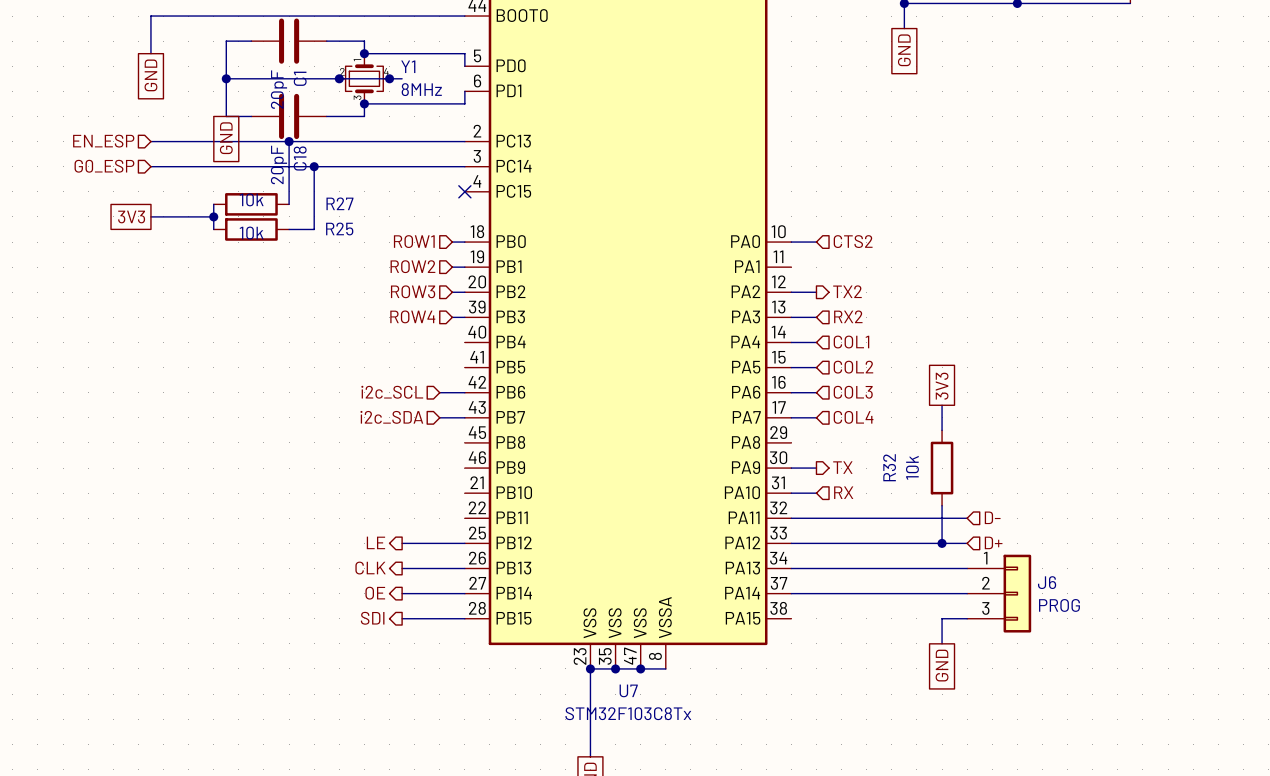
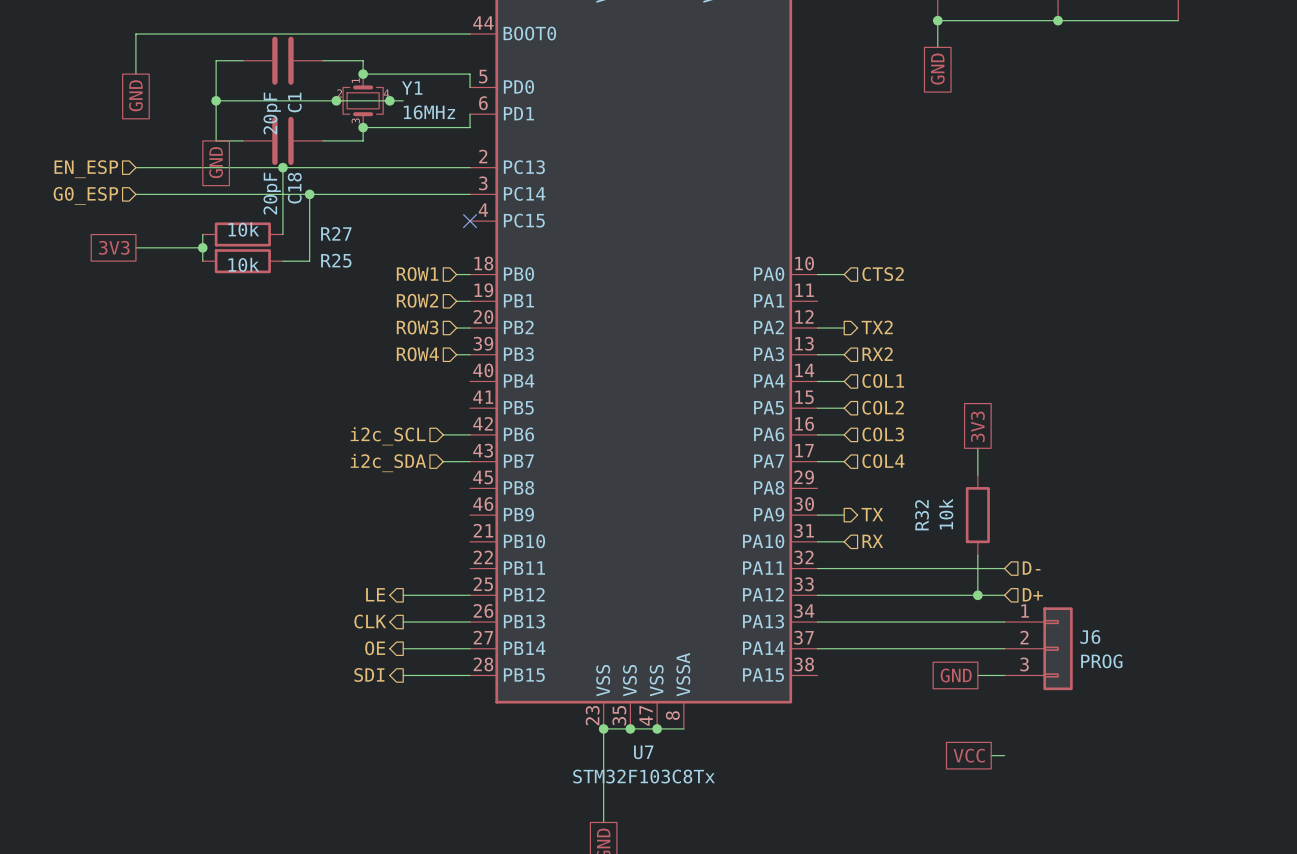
Y1 value: 8MHz (421, 89) -> 16MHz (429, 112)
wire: (942, 618) (942, 643) -> none
global label rotation: 0° (942, 665) -> 90° clockwise (956, 675)
global label: none -> VCC (969, 755)
wire: none -> (991, 755) (1004, 755)

